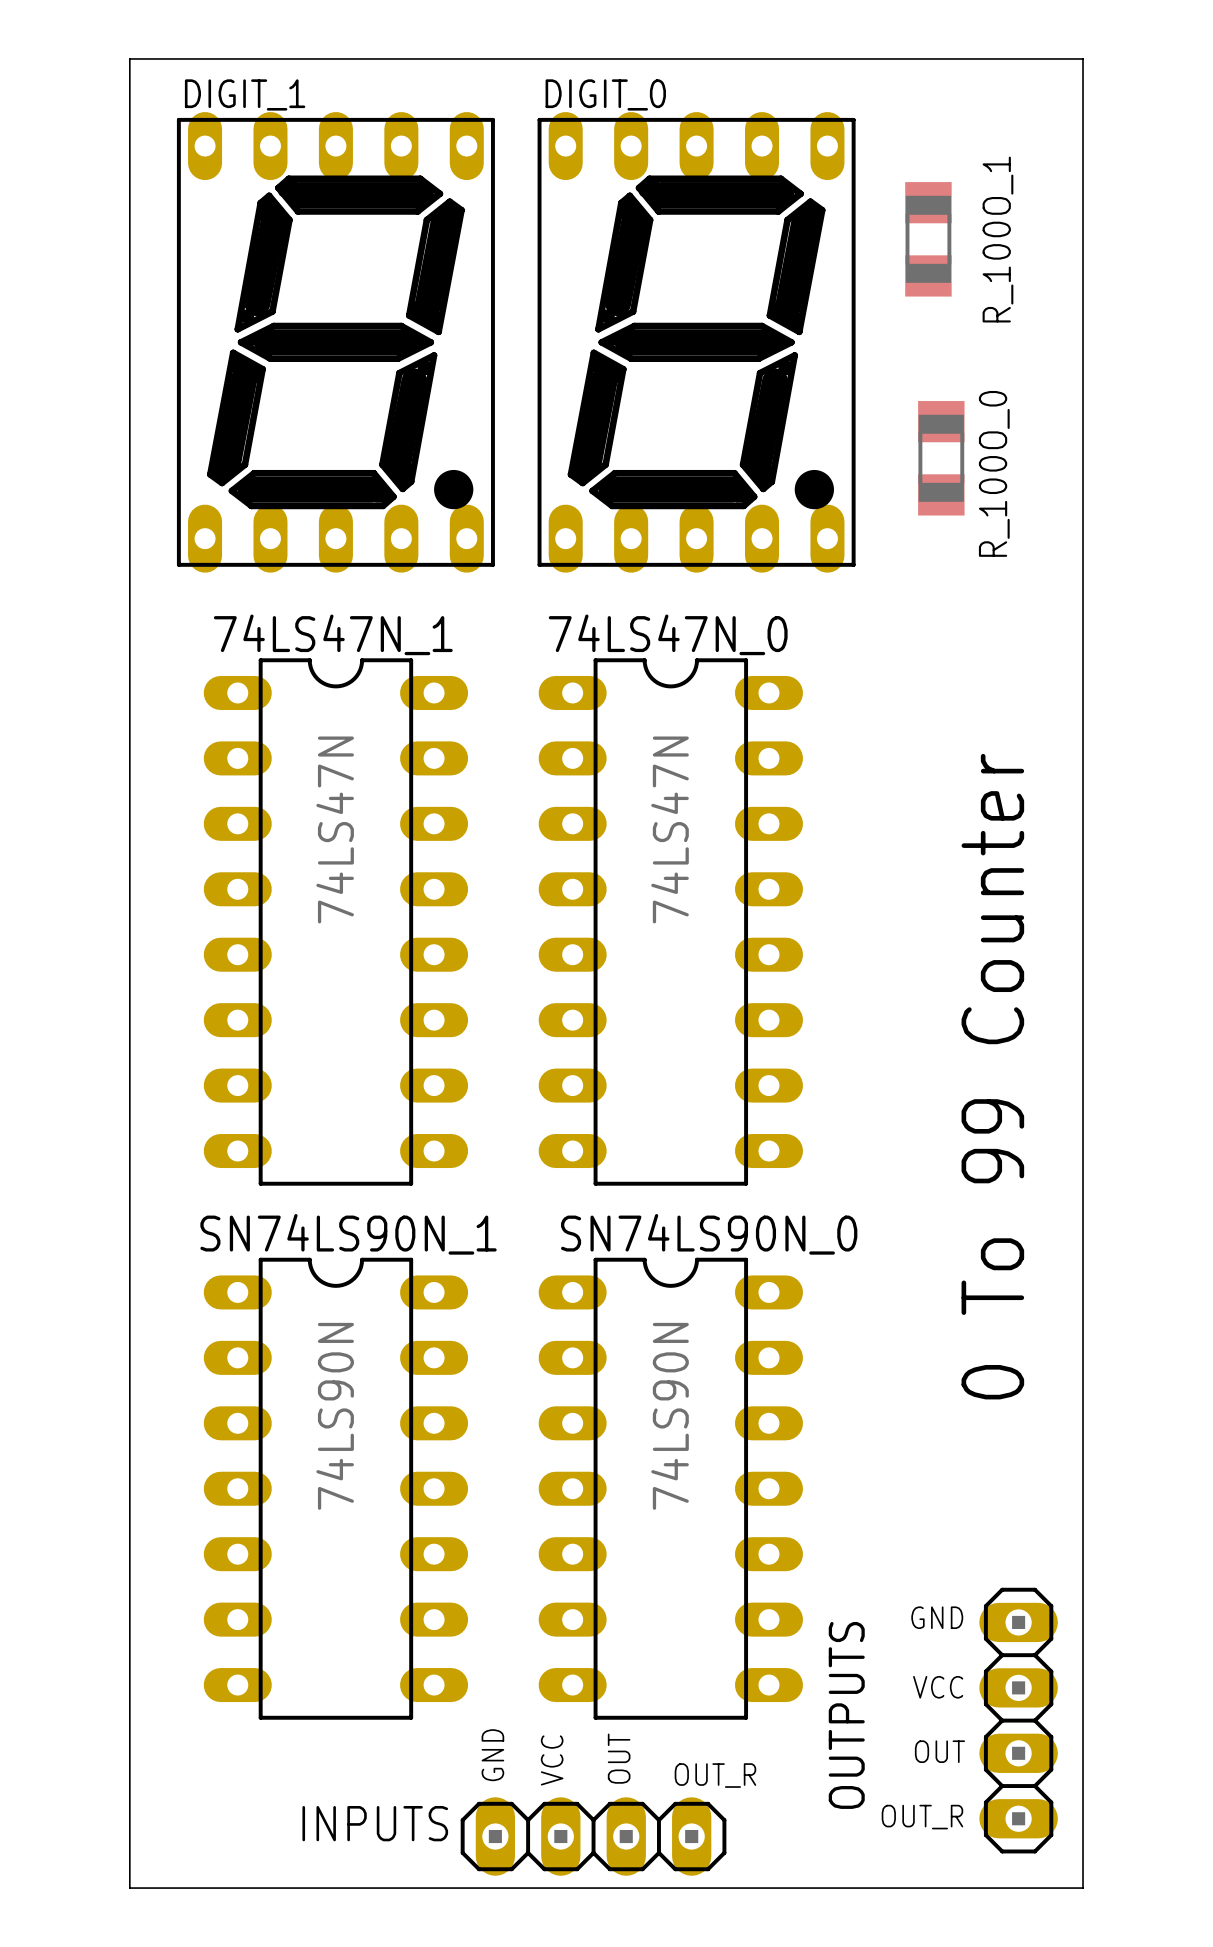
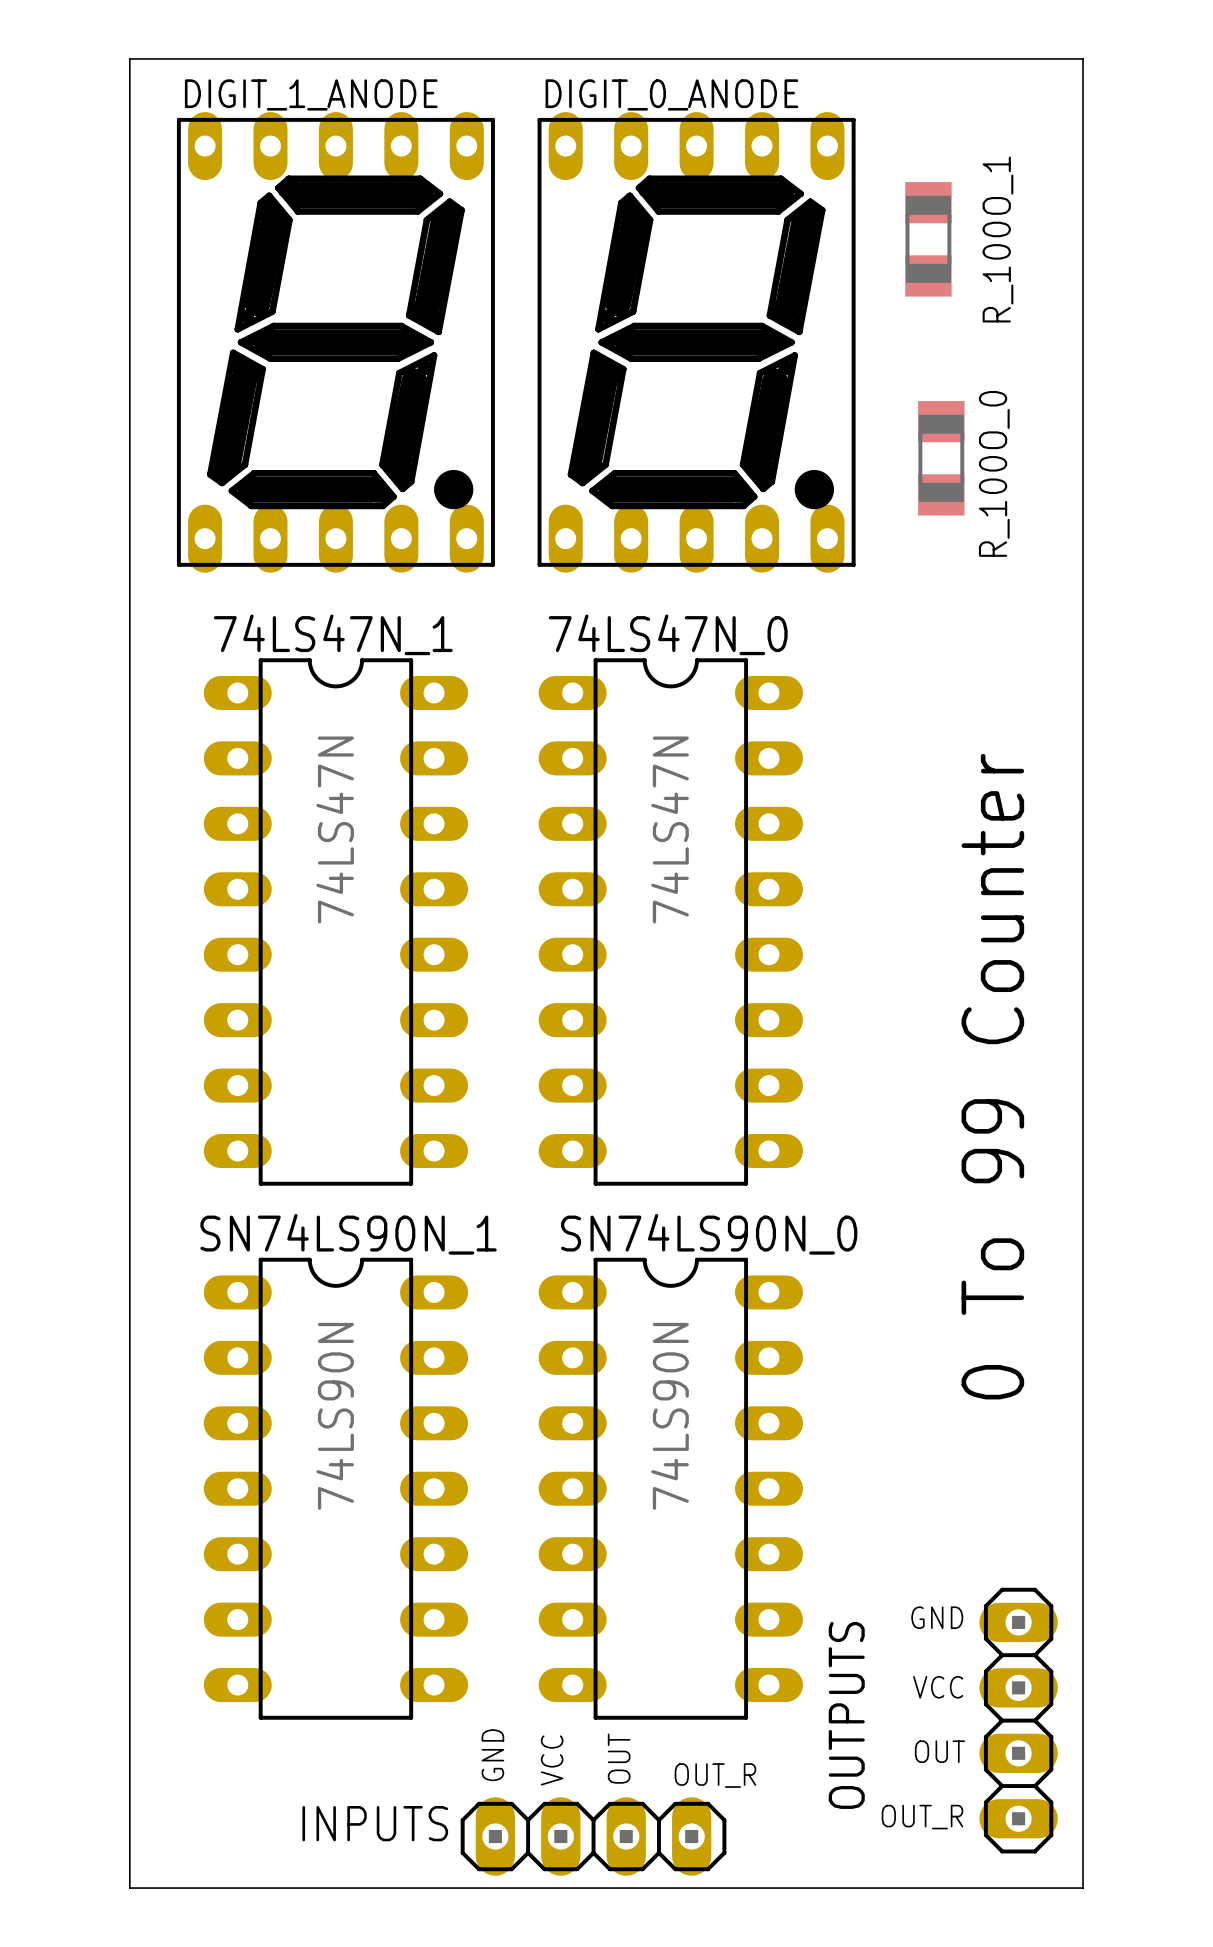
DIGIT_1 name: DIGIT_1 (245, 94) -> DIGIT_1_ANODE (311, 94)
DIGIT_0 name: DIGIT_0 (605, 94) -> DIGIT_0_ANODE (671, 94)

